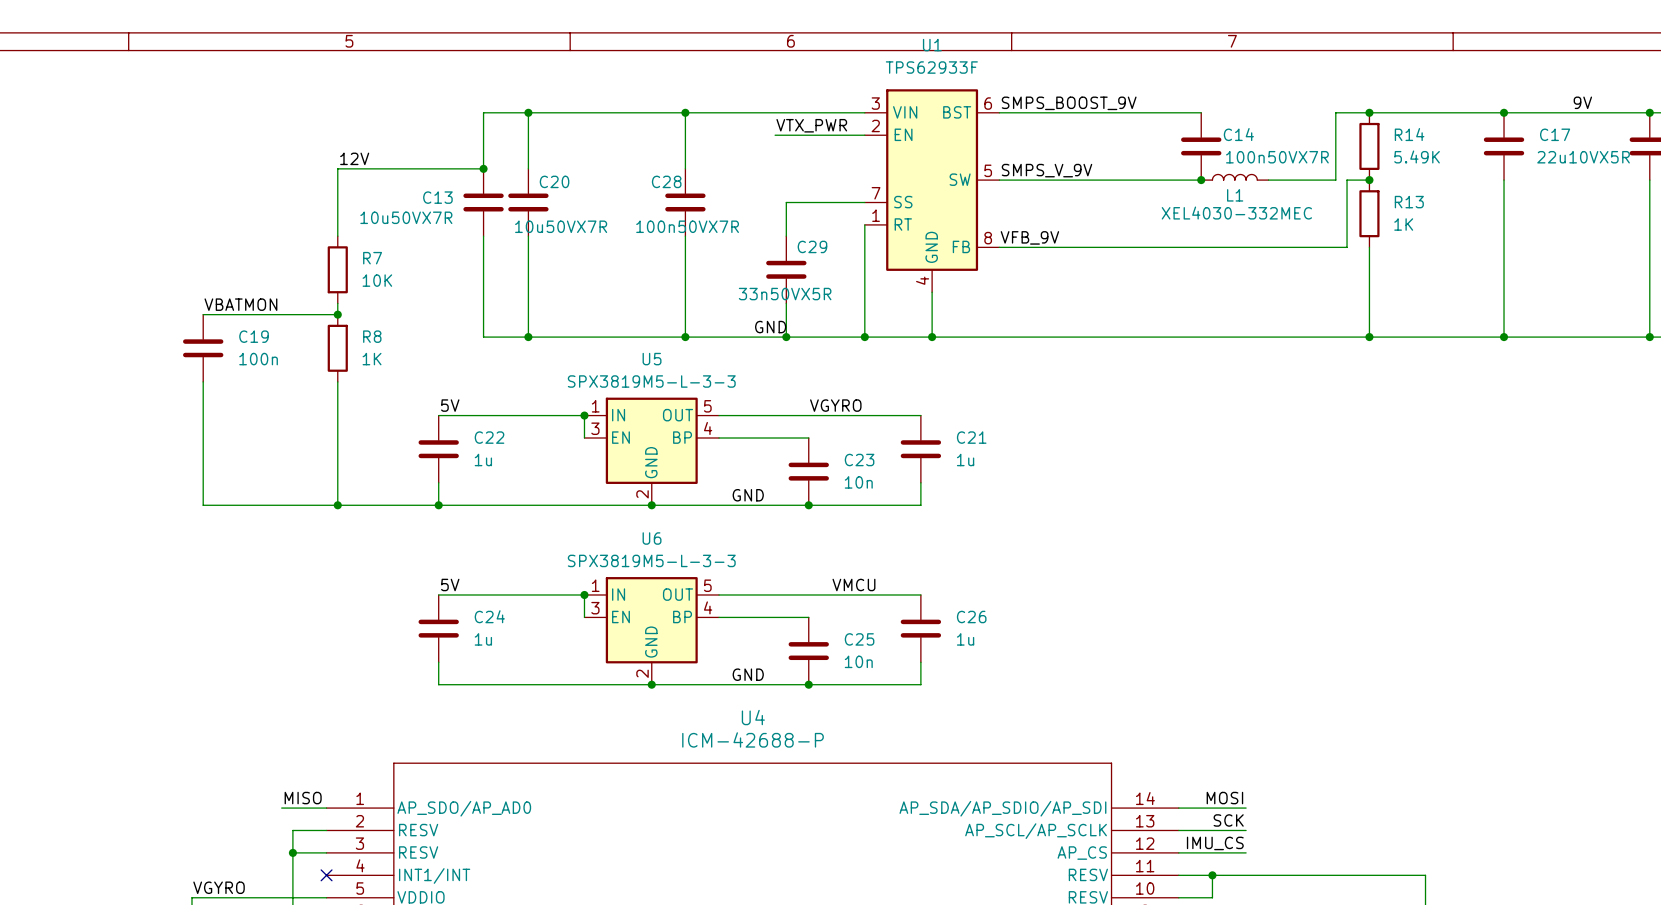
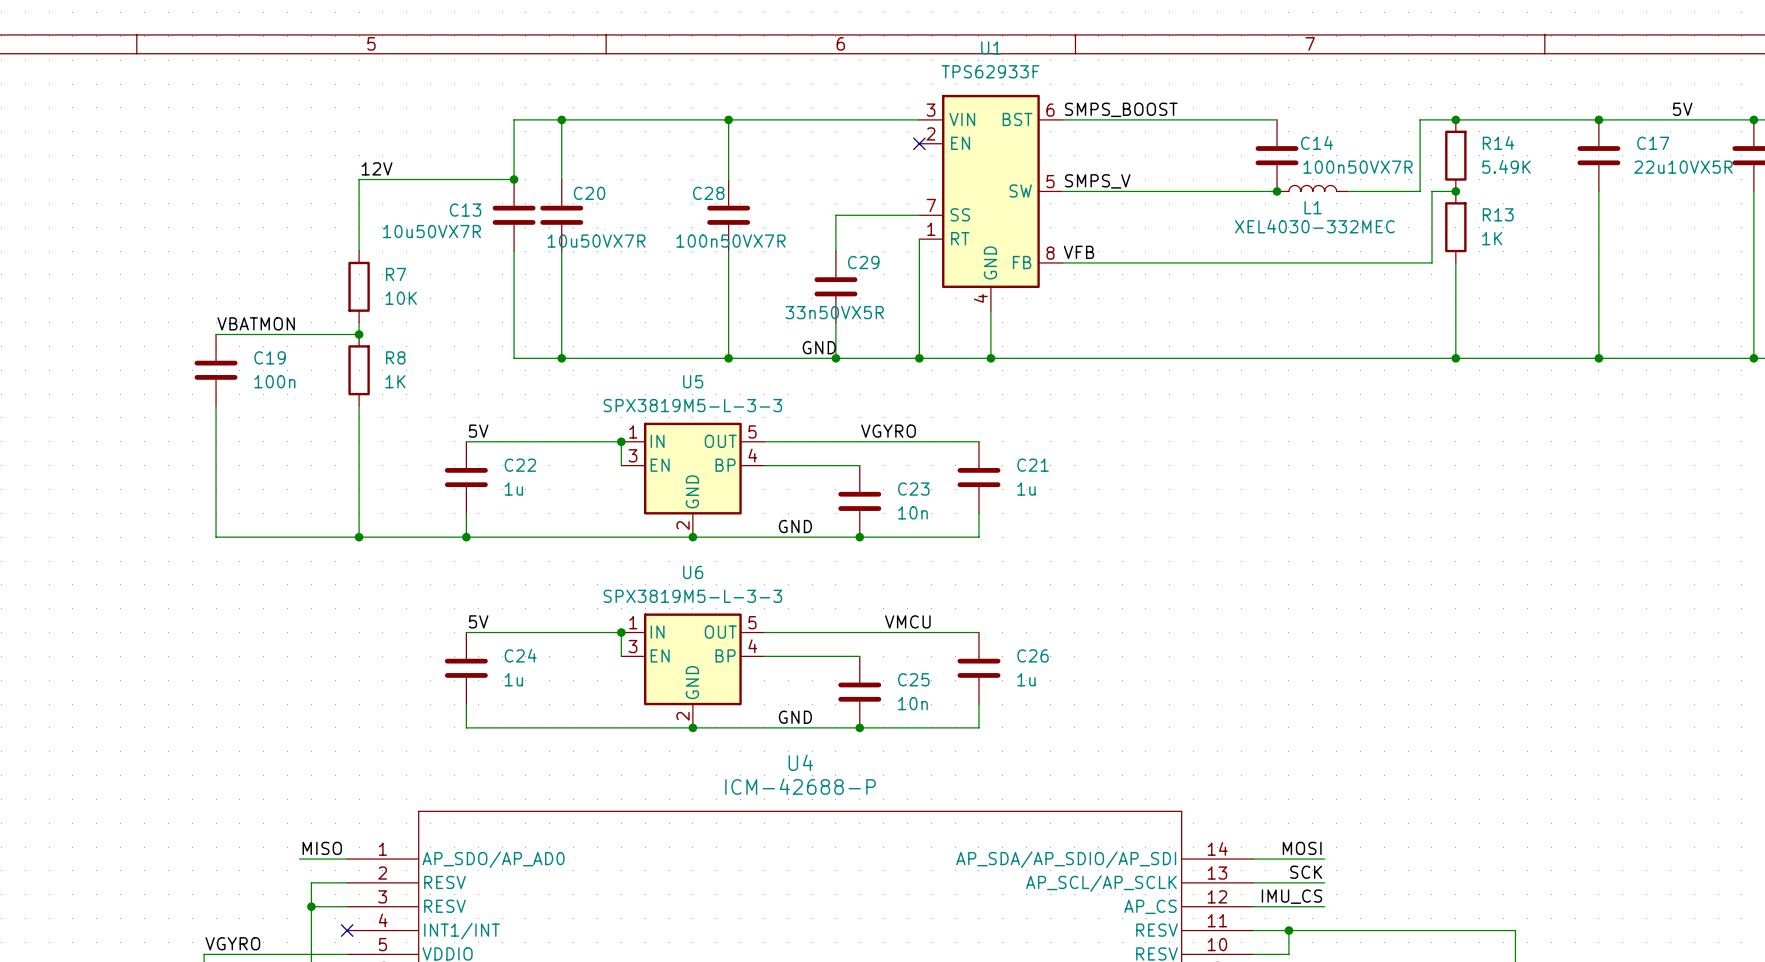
label: 9V (1582, 102) -> 5V (1682, 109)
label: SMPS_BOOST_9V (1069, 103) -> SMPS_BOOST (1121, 109)
label: VTX_PWR (811, 125) -> none
wire: (775, 135) (864, 135) -> none
no-connect mark: none -> (919, 143)
label: SMPS_V_9V (1047, 170) -> SMPS_V (1097, 181)
label: VFB_9V (1029, 237) -> VFB (1078, 252)

